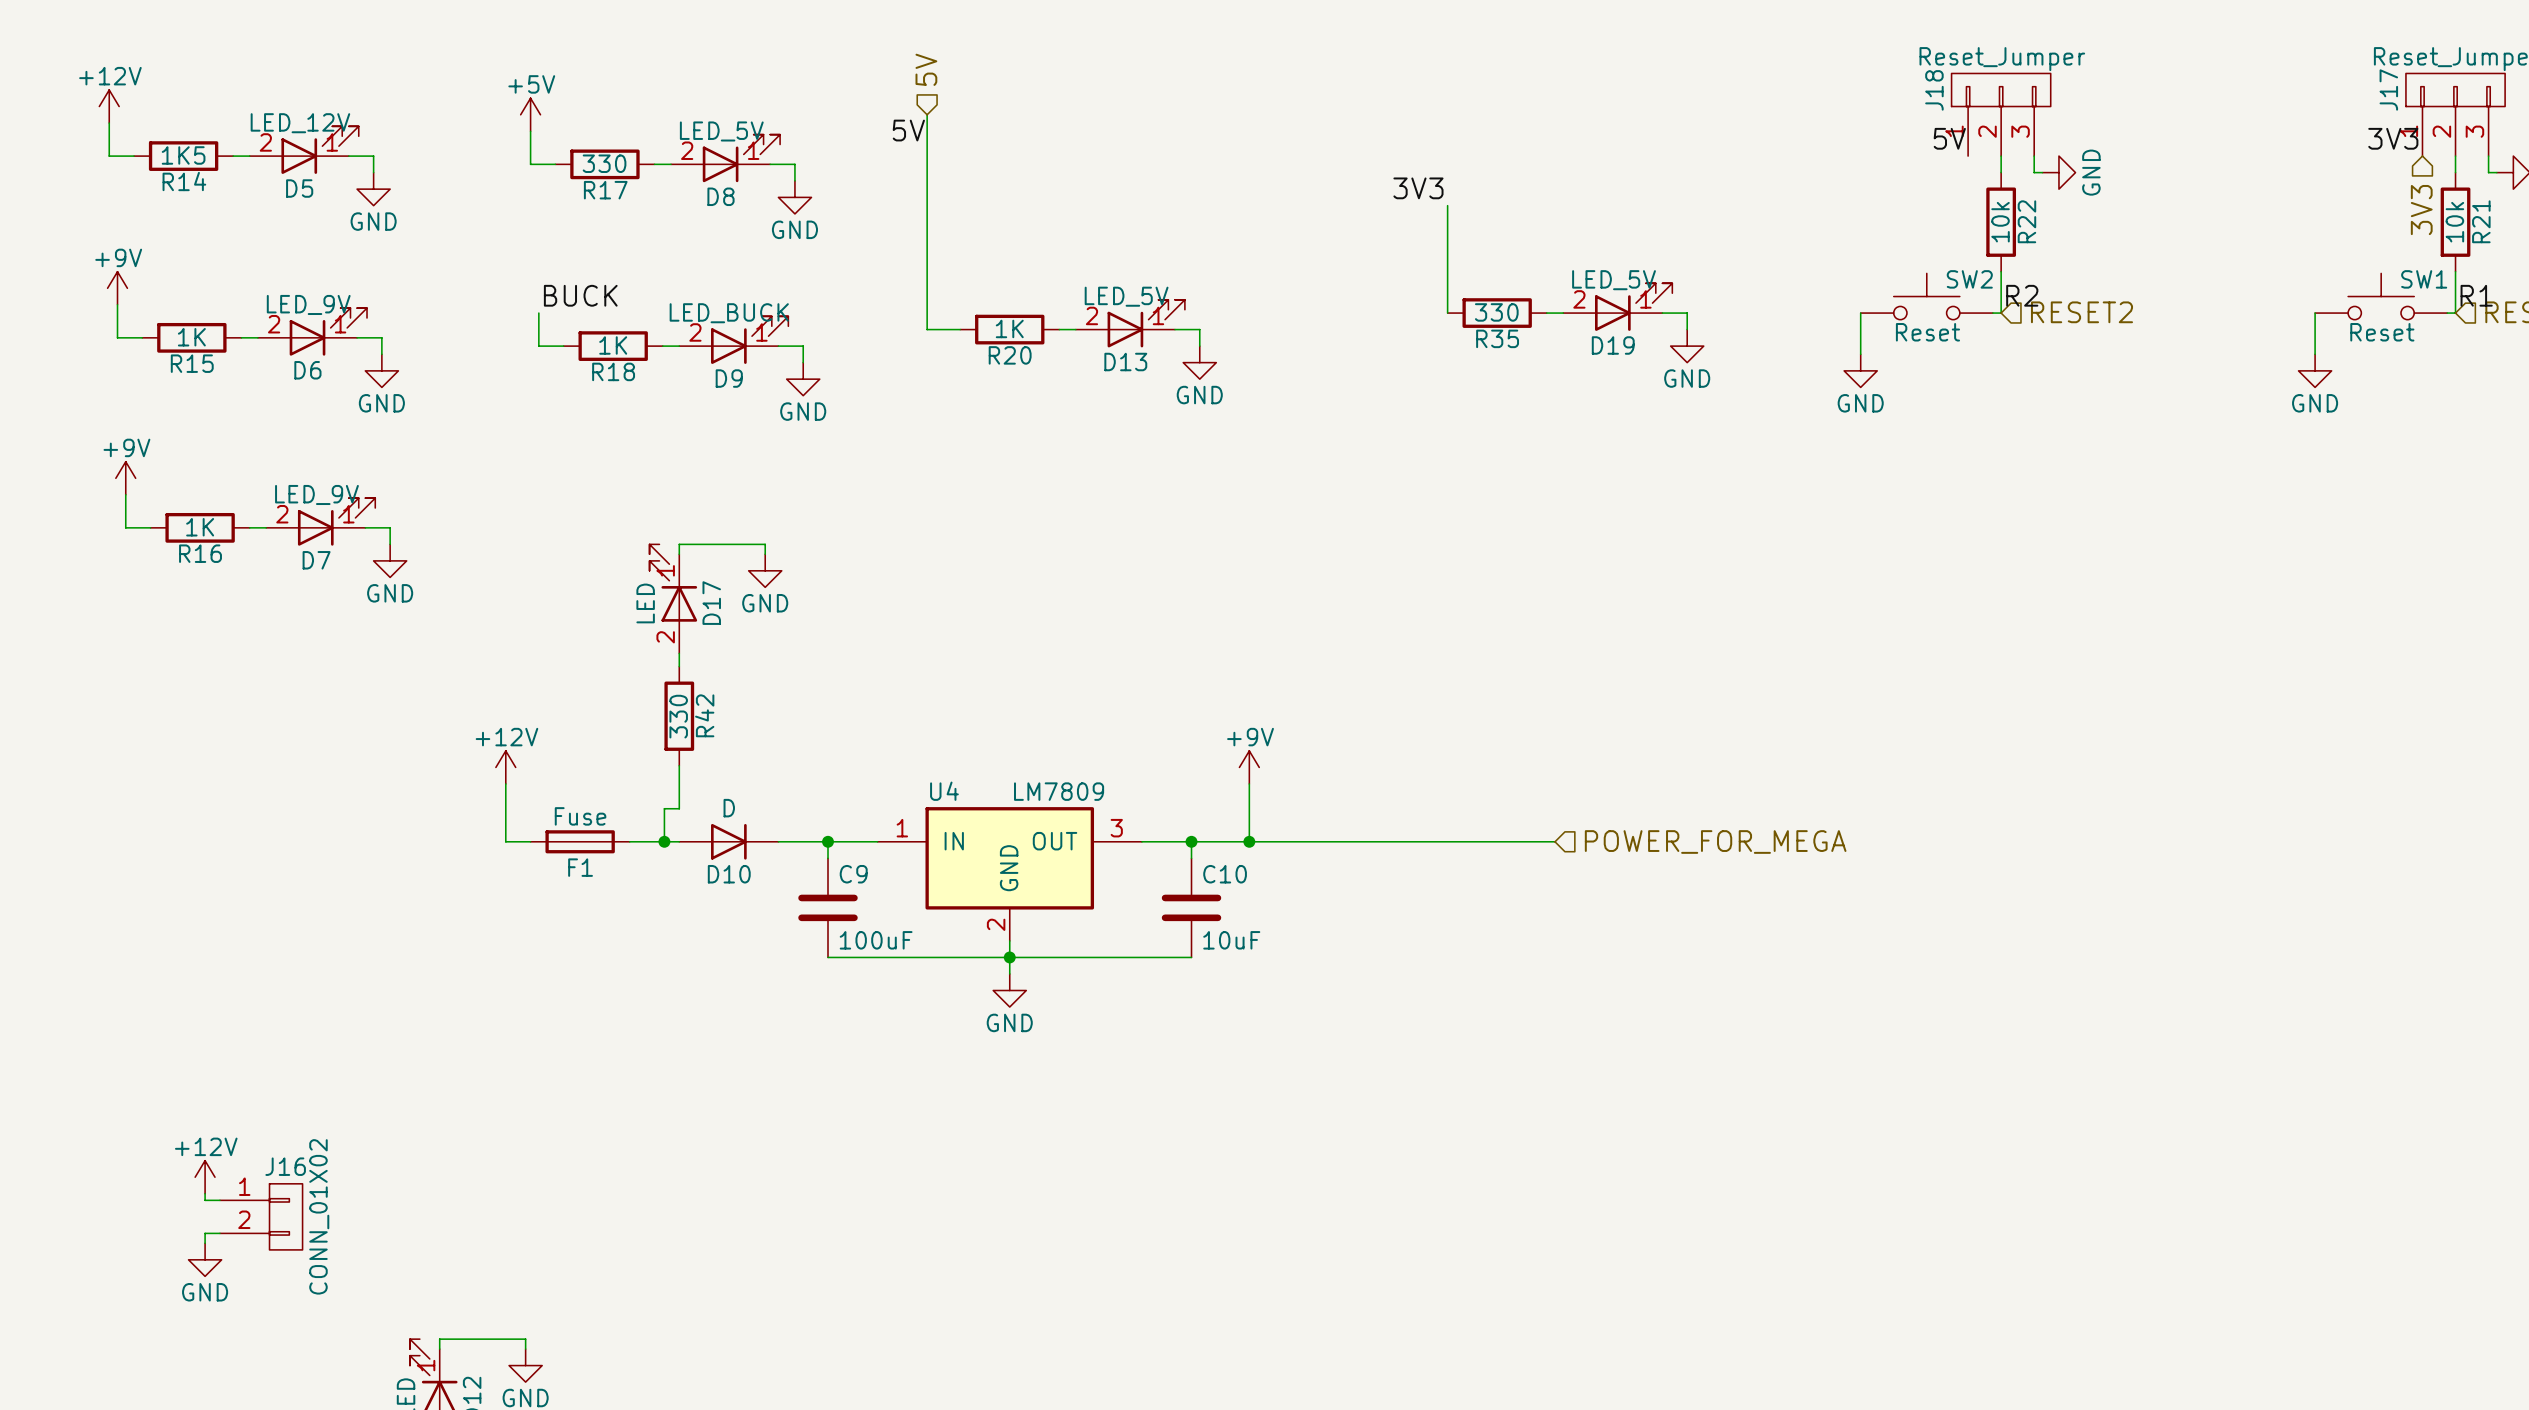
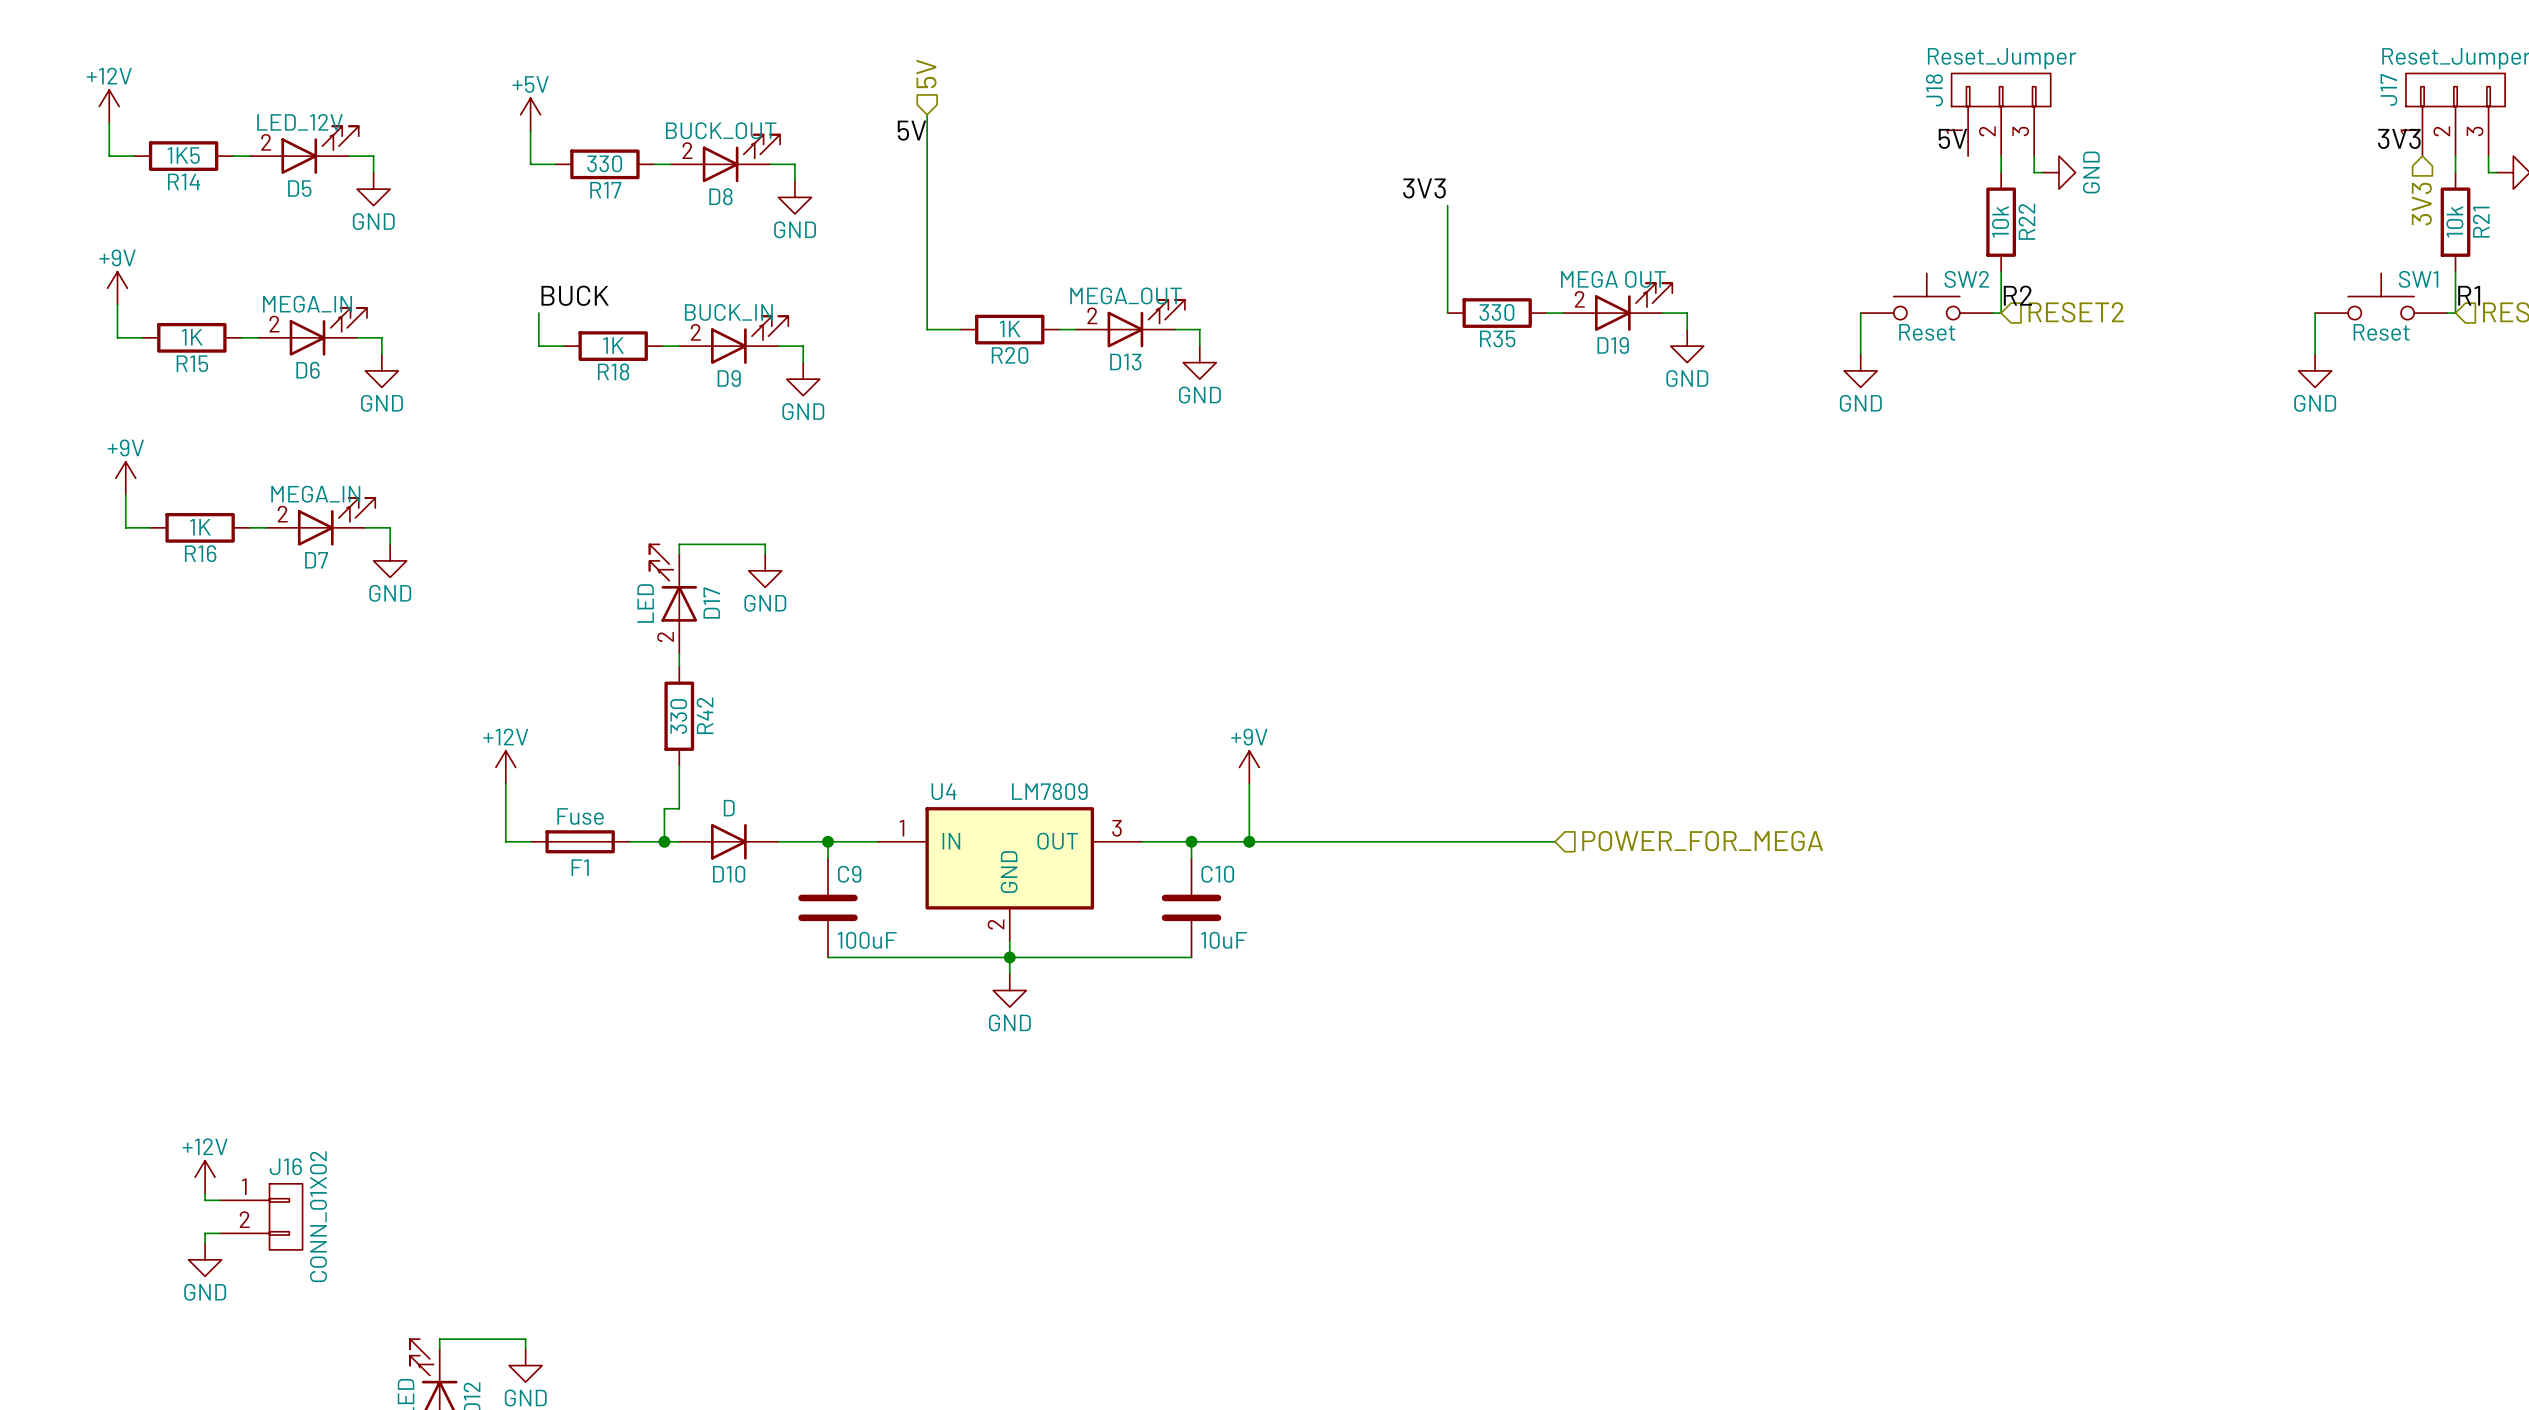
D8 value: LED_5V (721, 131) -> BUCK_OUT (721, 130)
D19 value: LED_5V (1614, 280) -> MEGA OUT (1613, 279)
D13 value: LED_5V (1126, 296) -> MEGA_OUT (1126, 295)
D6 value: LED_9V (308, 304) -> MEGA_IN (307, 304)
D9 value: LED_BUCK (729, 313) -> BUCK_IN (728, 312)
D7 value: LED_9V (316, 494) -> MEGA_IN (315, 494)

